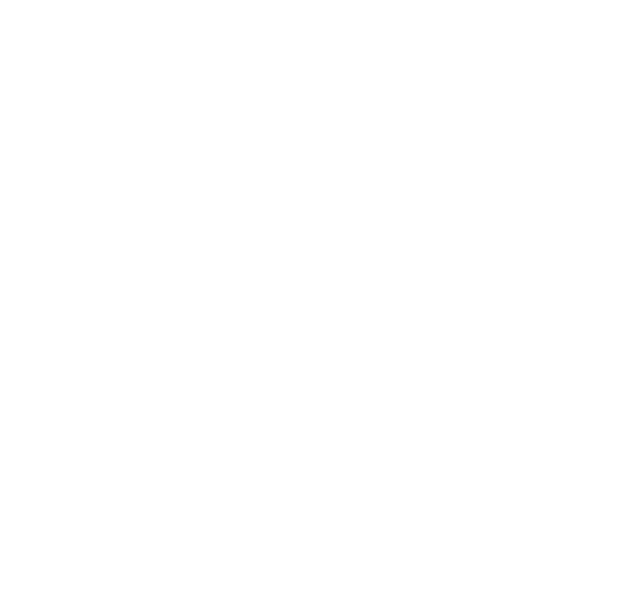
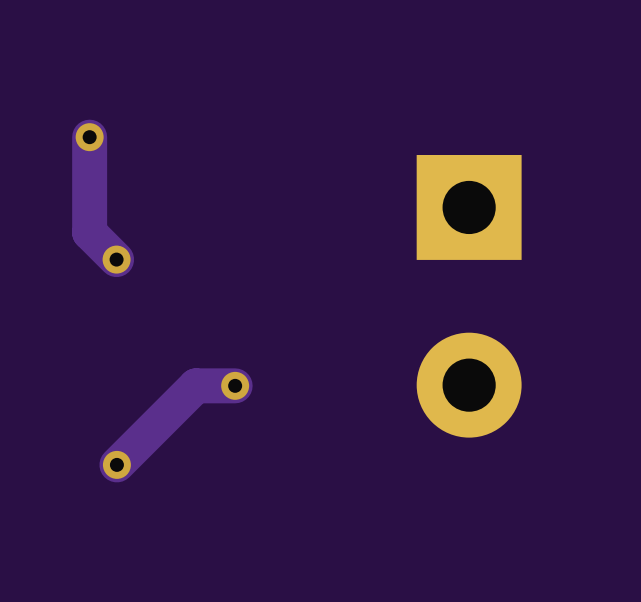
track: none -> (89, 137) (89, 232) (116, 259)
via: none -> (89, 137)
via: none -> (116, 259)
part: none -> (469, 296)
track: none -> (235, 385) (195, 385) (116, 464)
via: none -> (235, 385)
via: none -> (116, 464)

